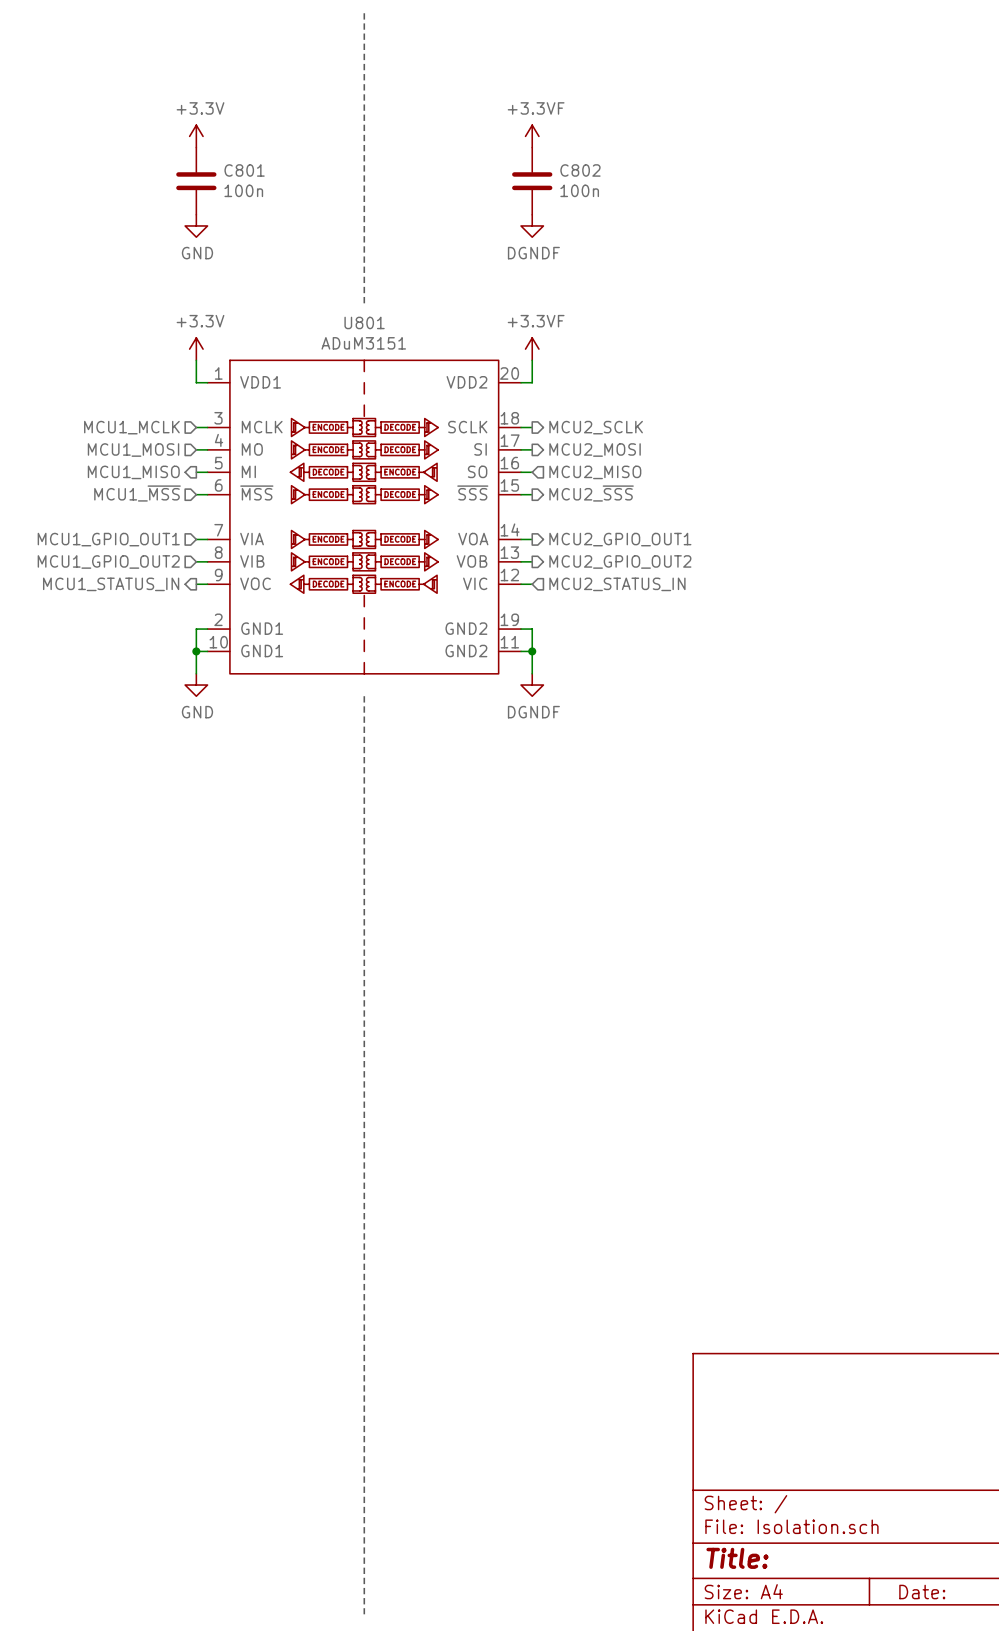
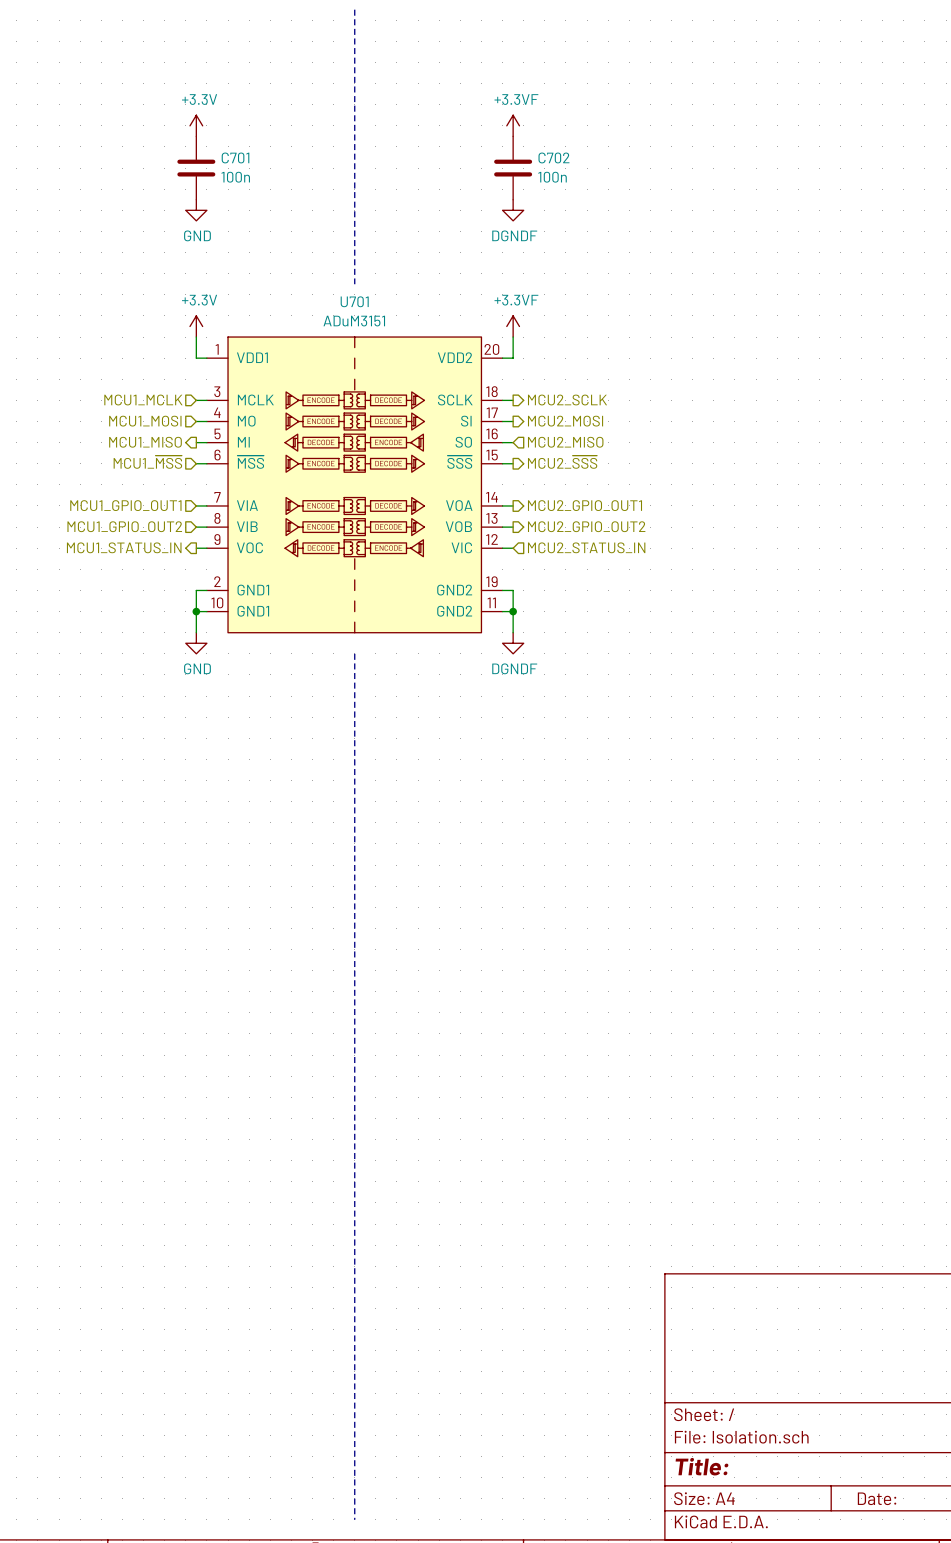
C801 name: C801 (244, 170) -> C701 (235, 157)
C802 name: C802 (580, 170) -> C702 (553, 157)
U801 name: U801 (364, 322) -> U701 (354, 301)

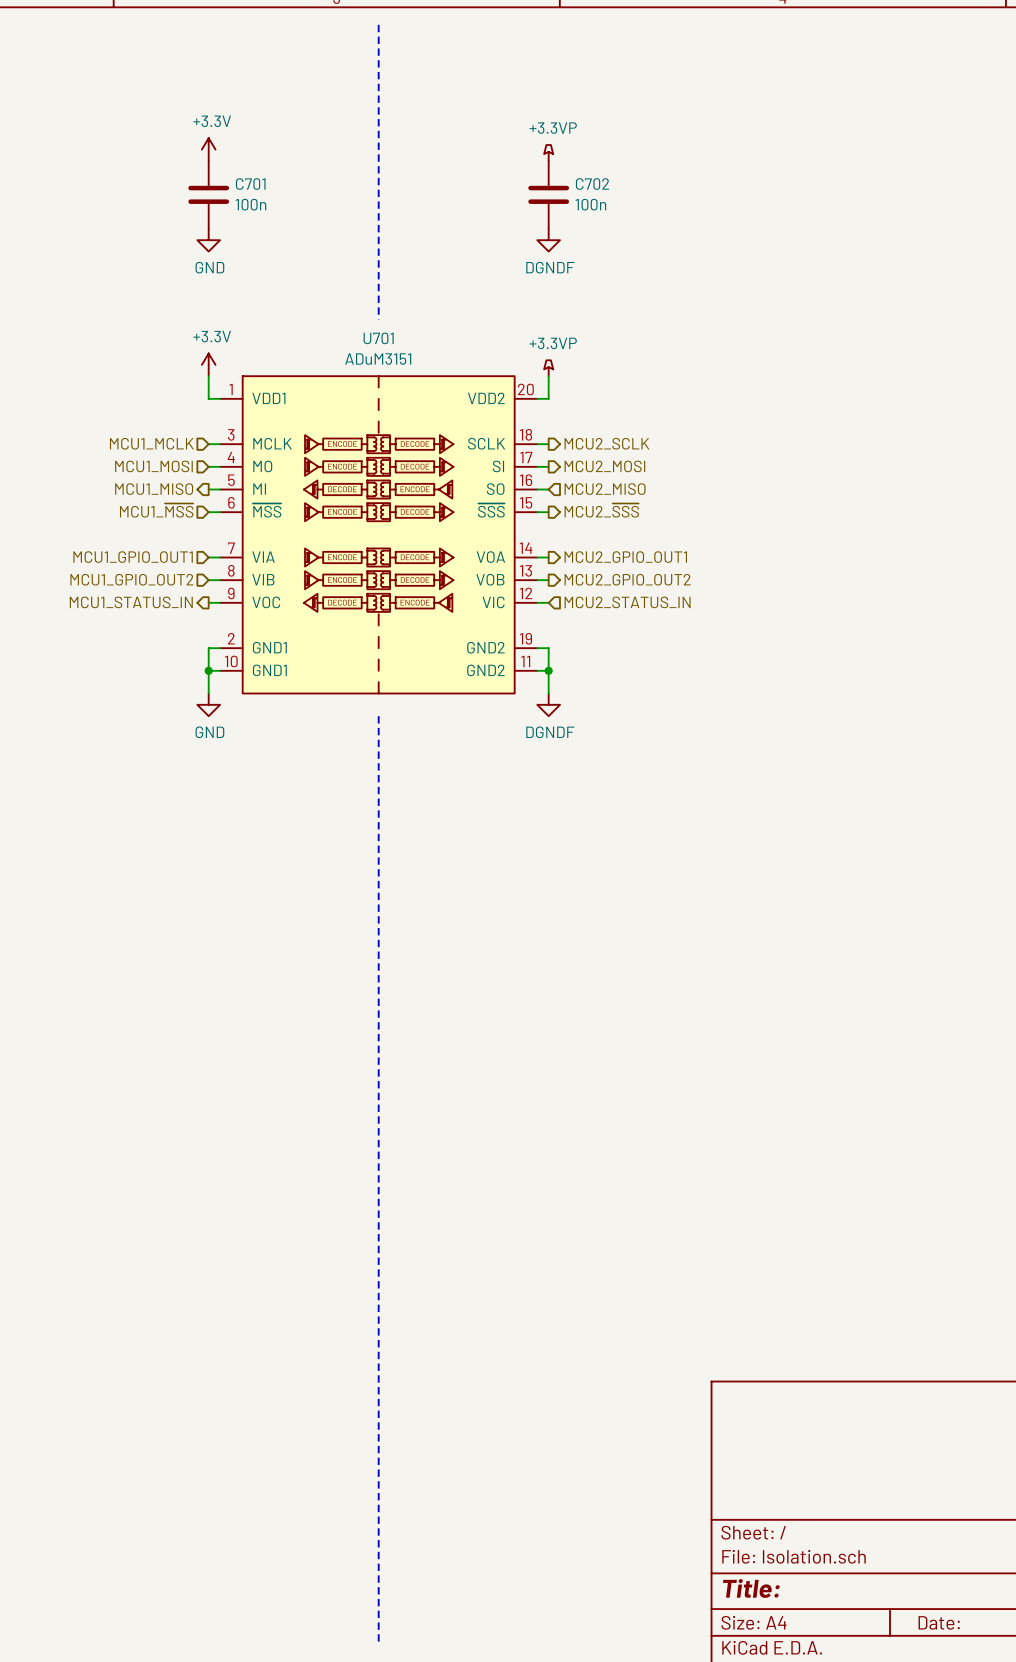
power symbol: +3.3VF (513, 125) -> +3.3VP (548, 152)
power symbol: +3.3VF (513, 326) -> +3.3VP (548, 368)

